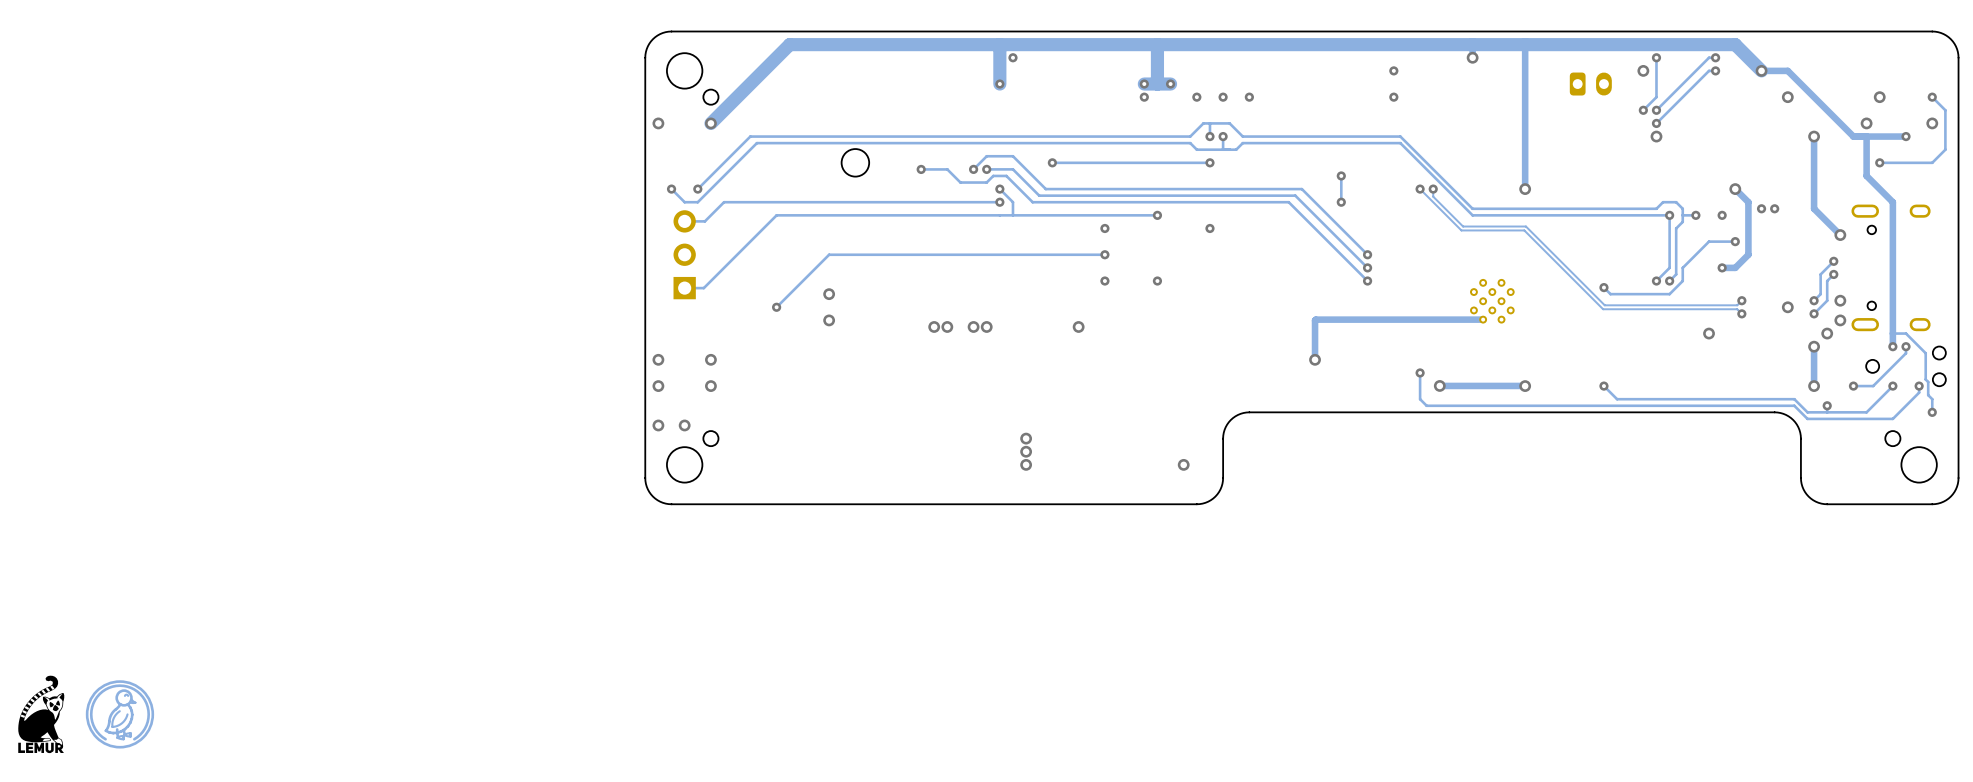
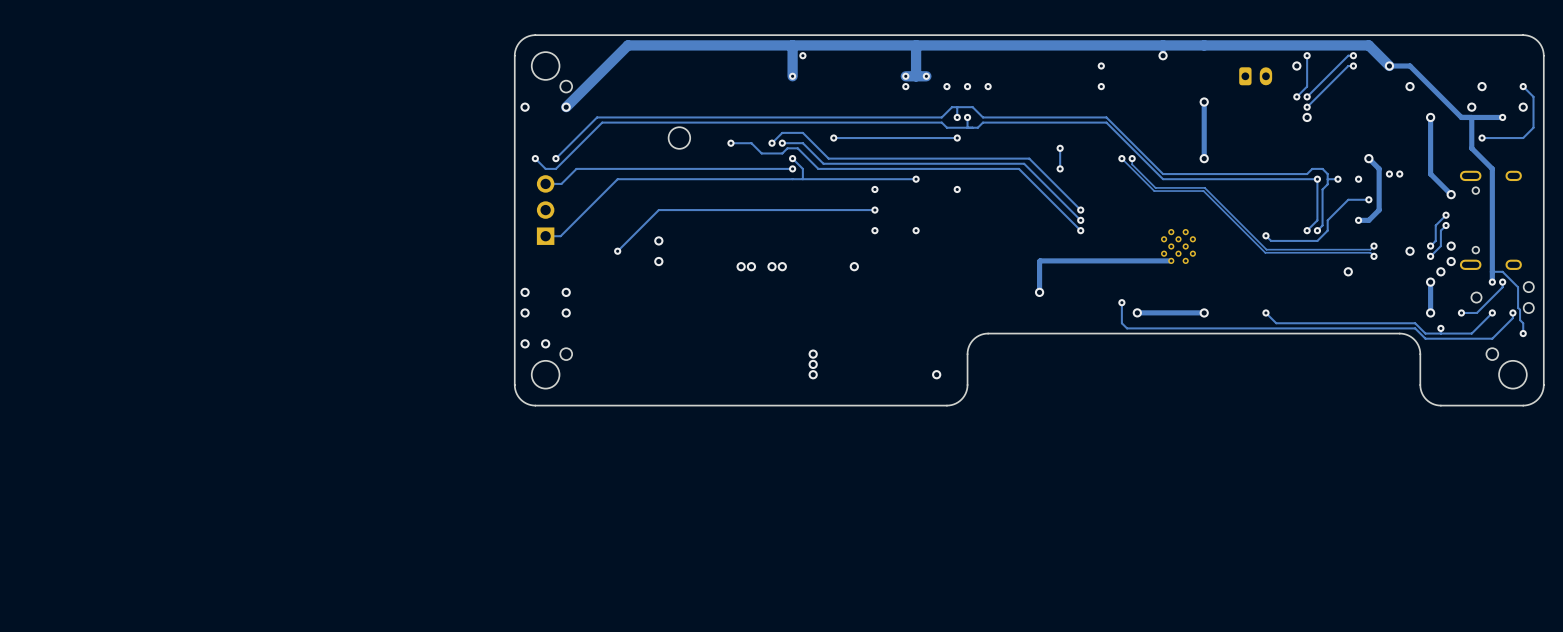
track: (1525, 44) (1525, 116) -> none
via: none -> (1204, 102)
drawing: [18, 675, 65, 754] -> none
drawing: [85, 680, 155, 749] -> none

